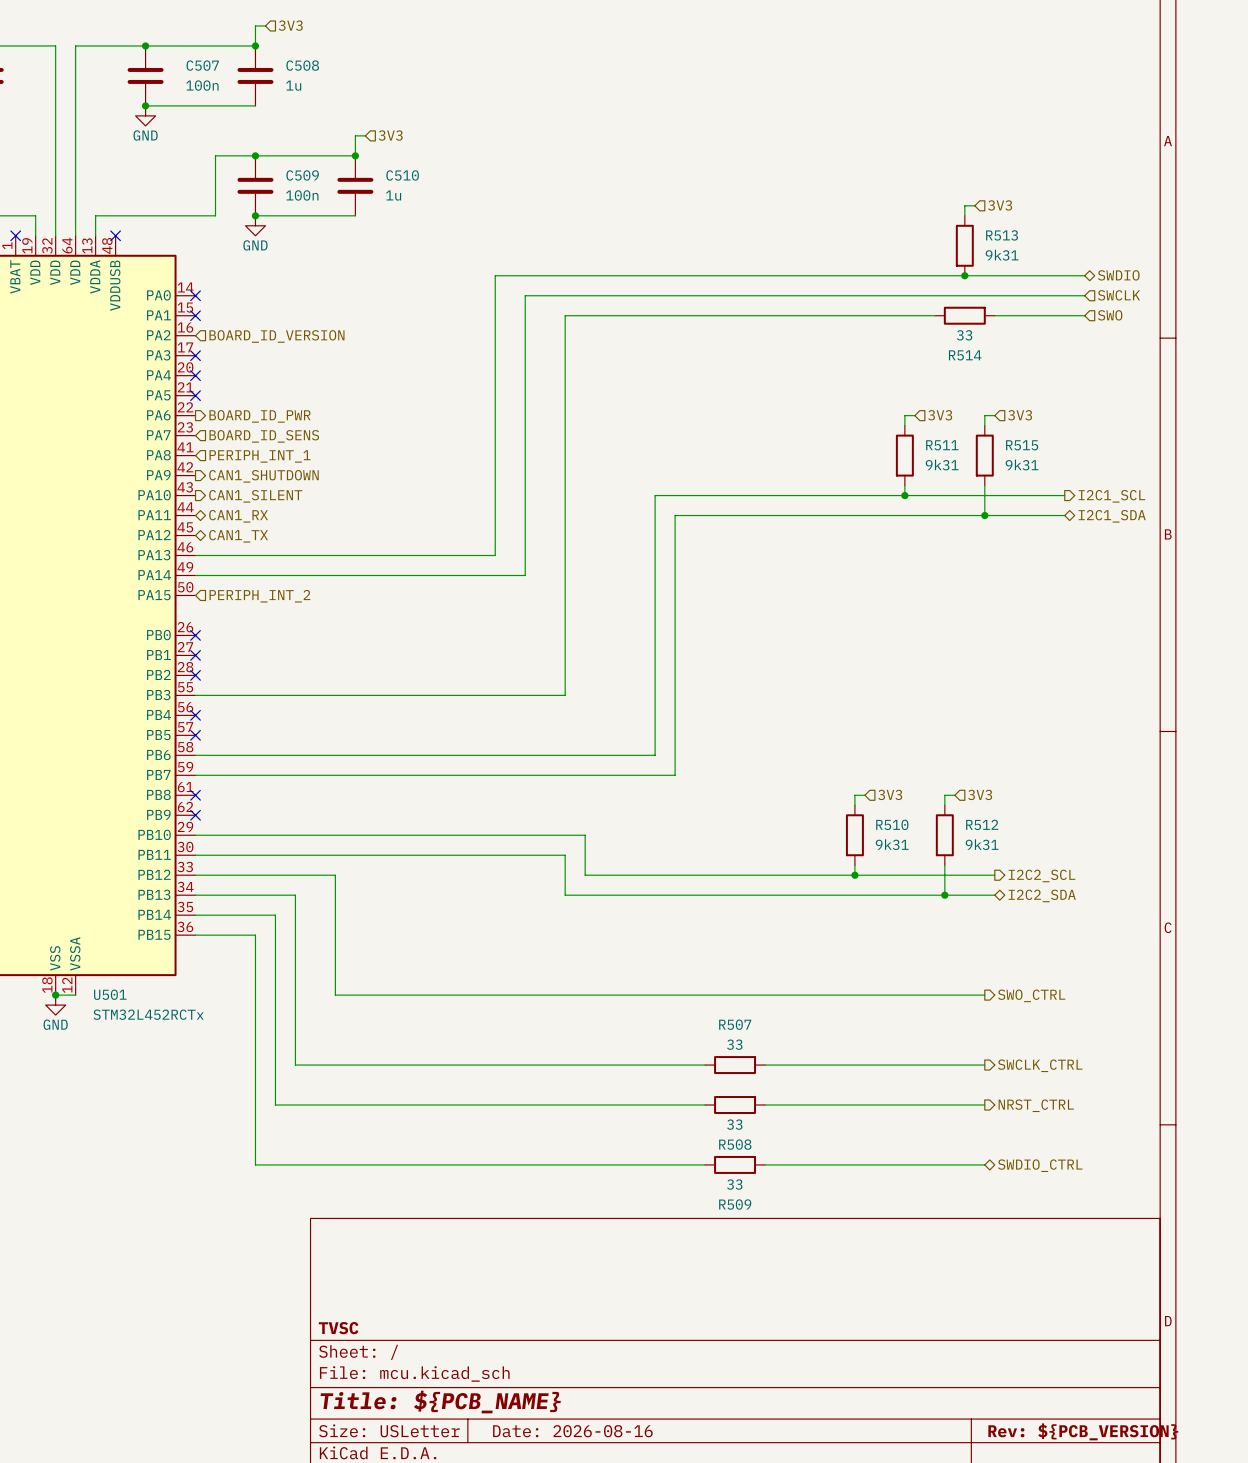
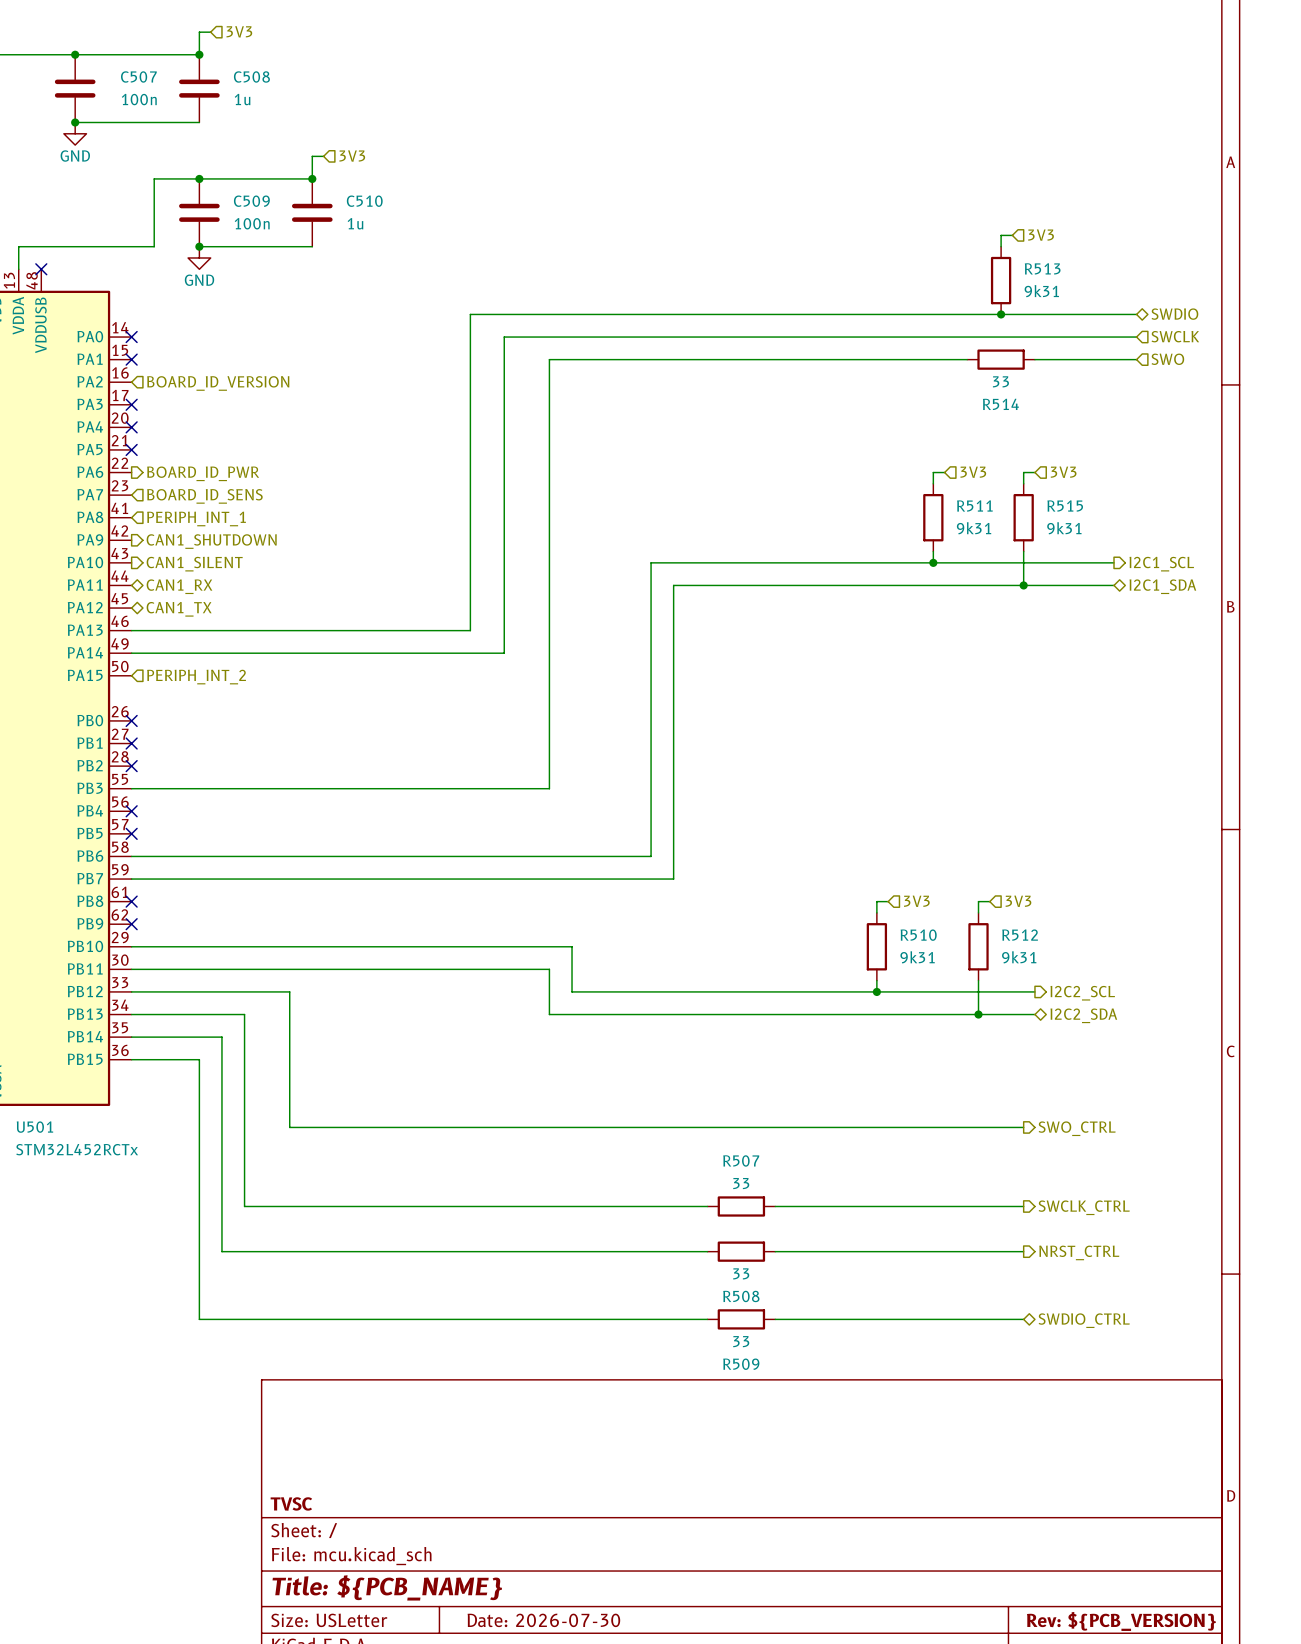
title block: Date: 2026-08-16 (572, 1431) -> Date: 2026-07-30 (543, 1620)

